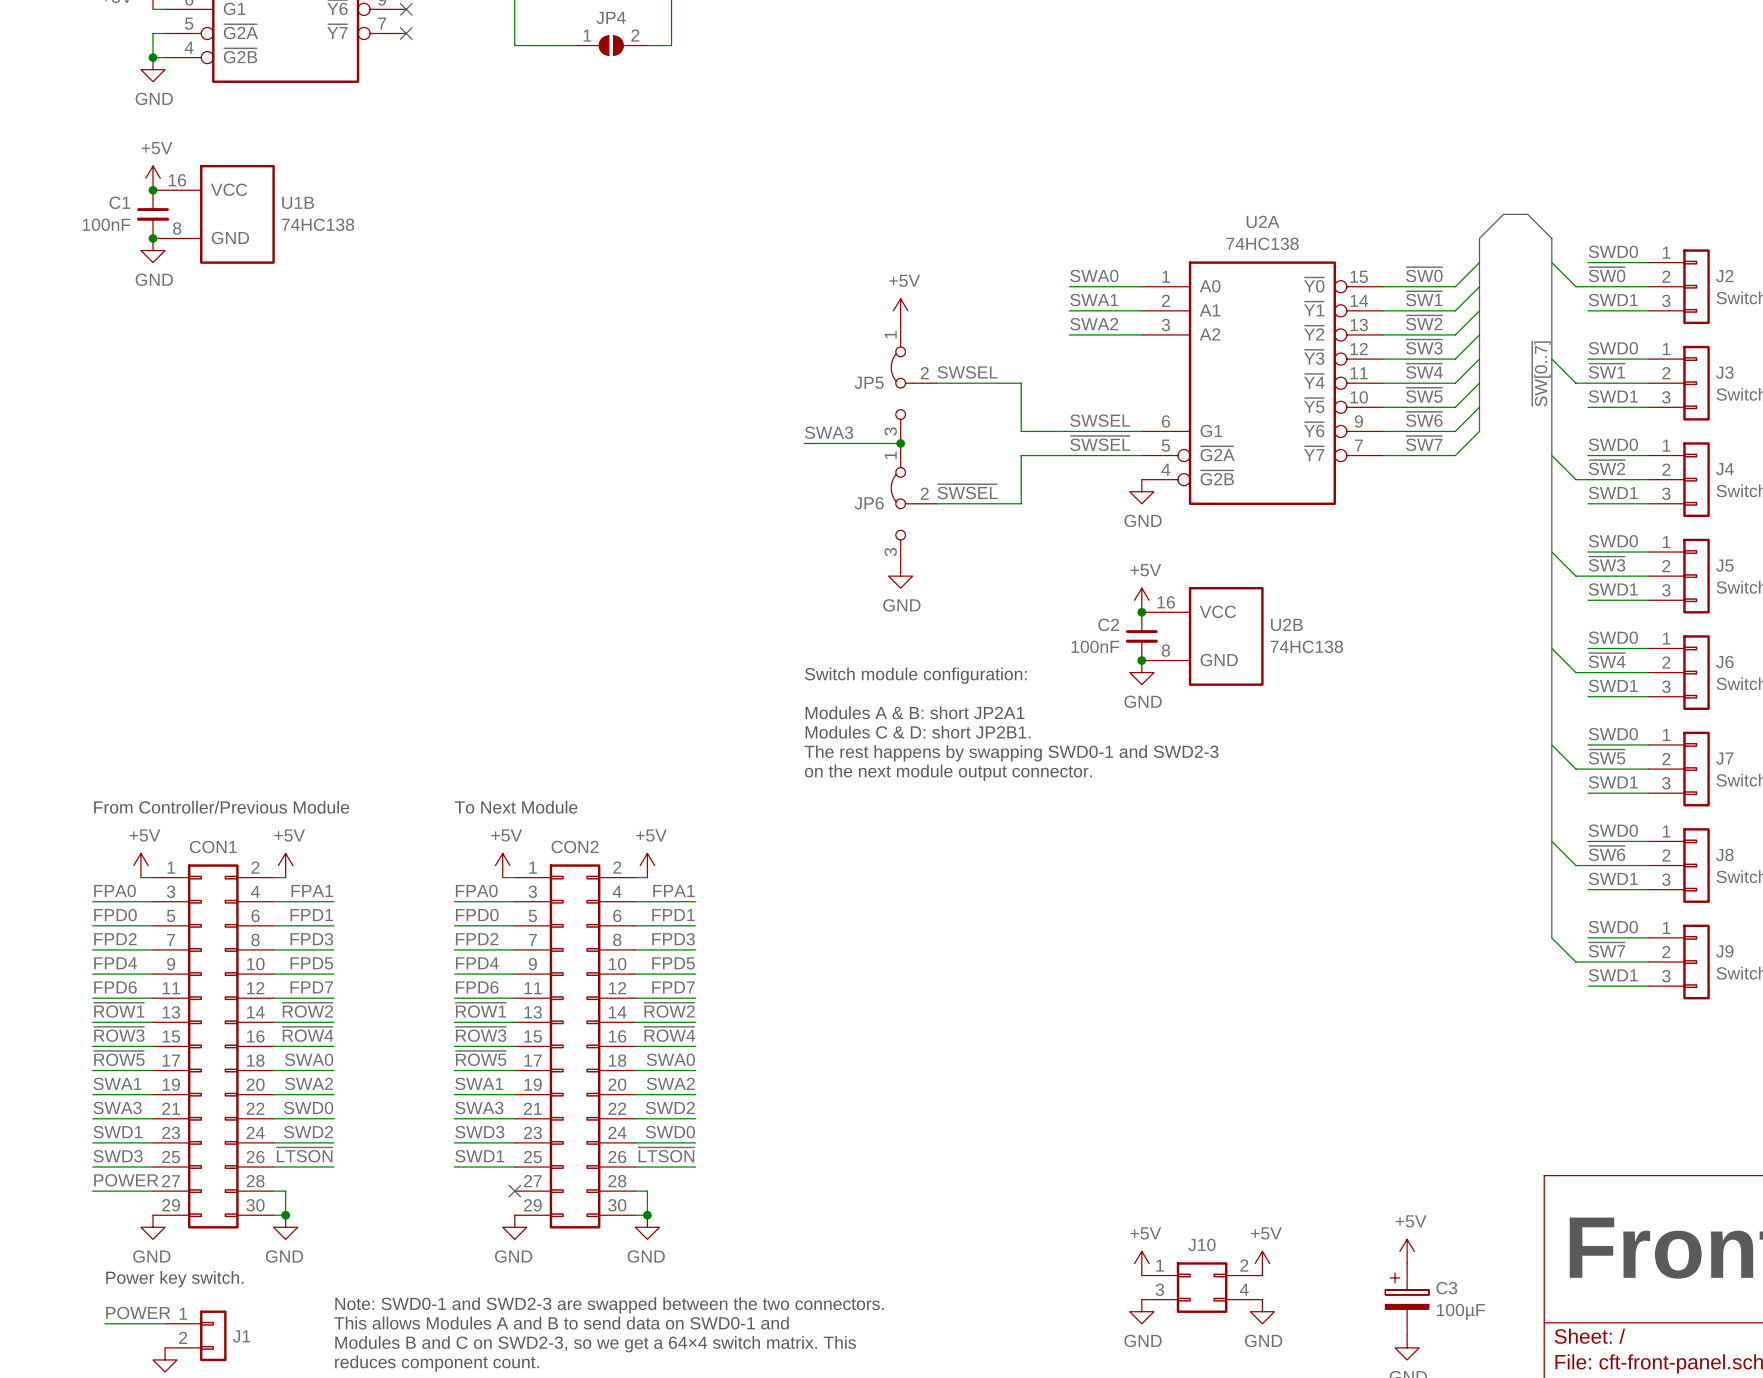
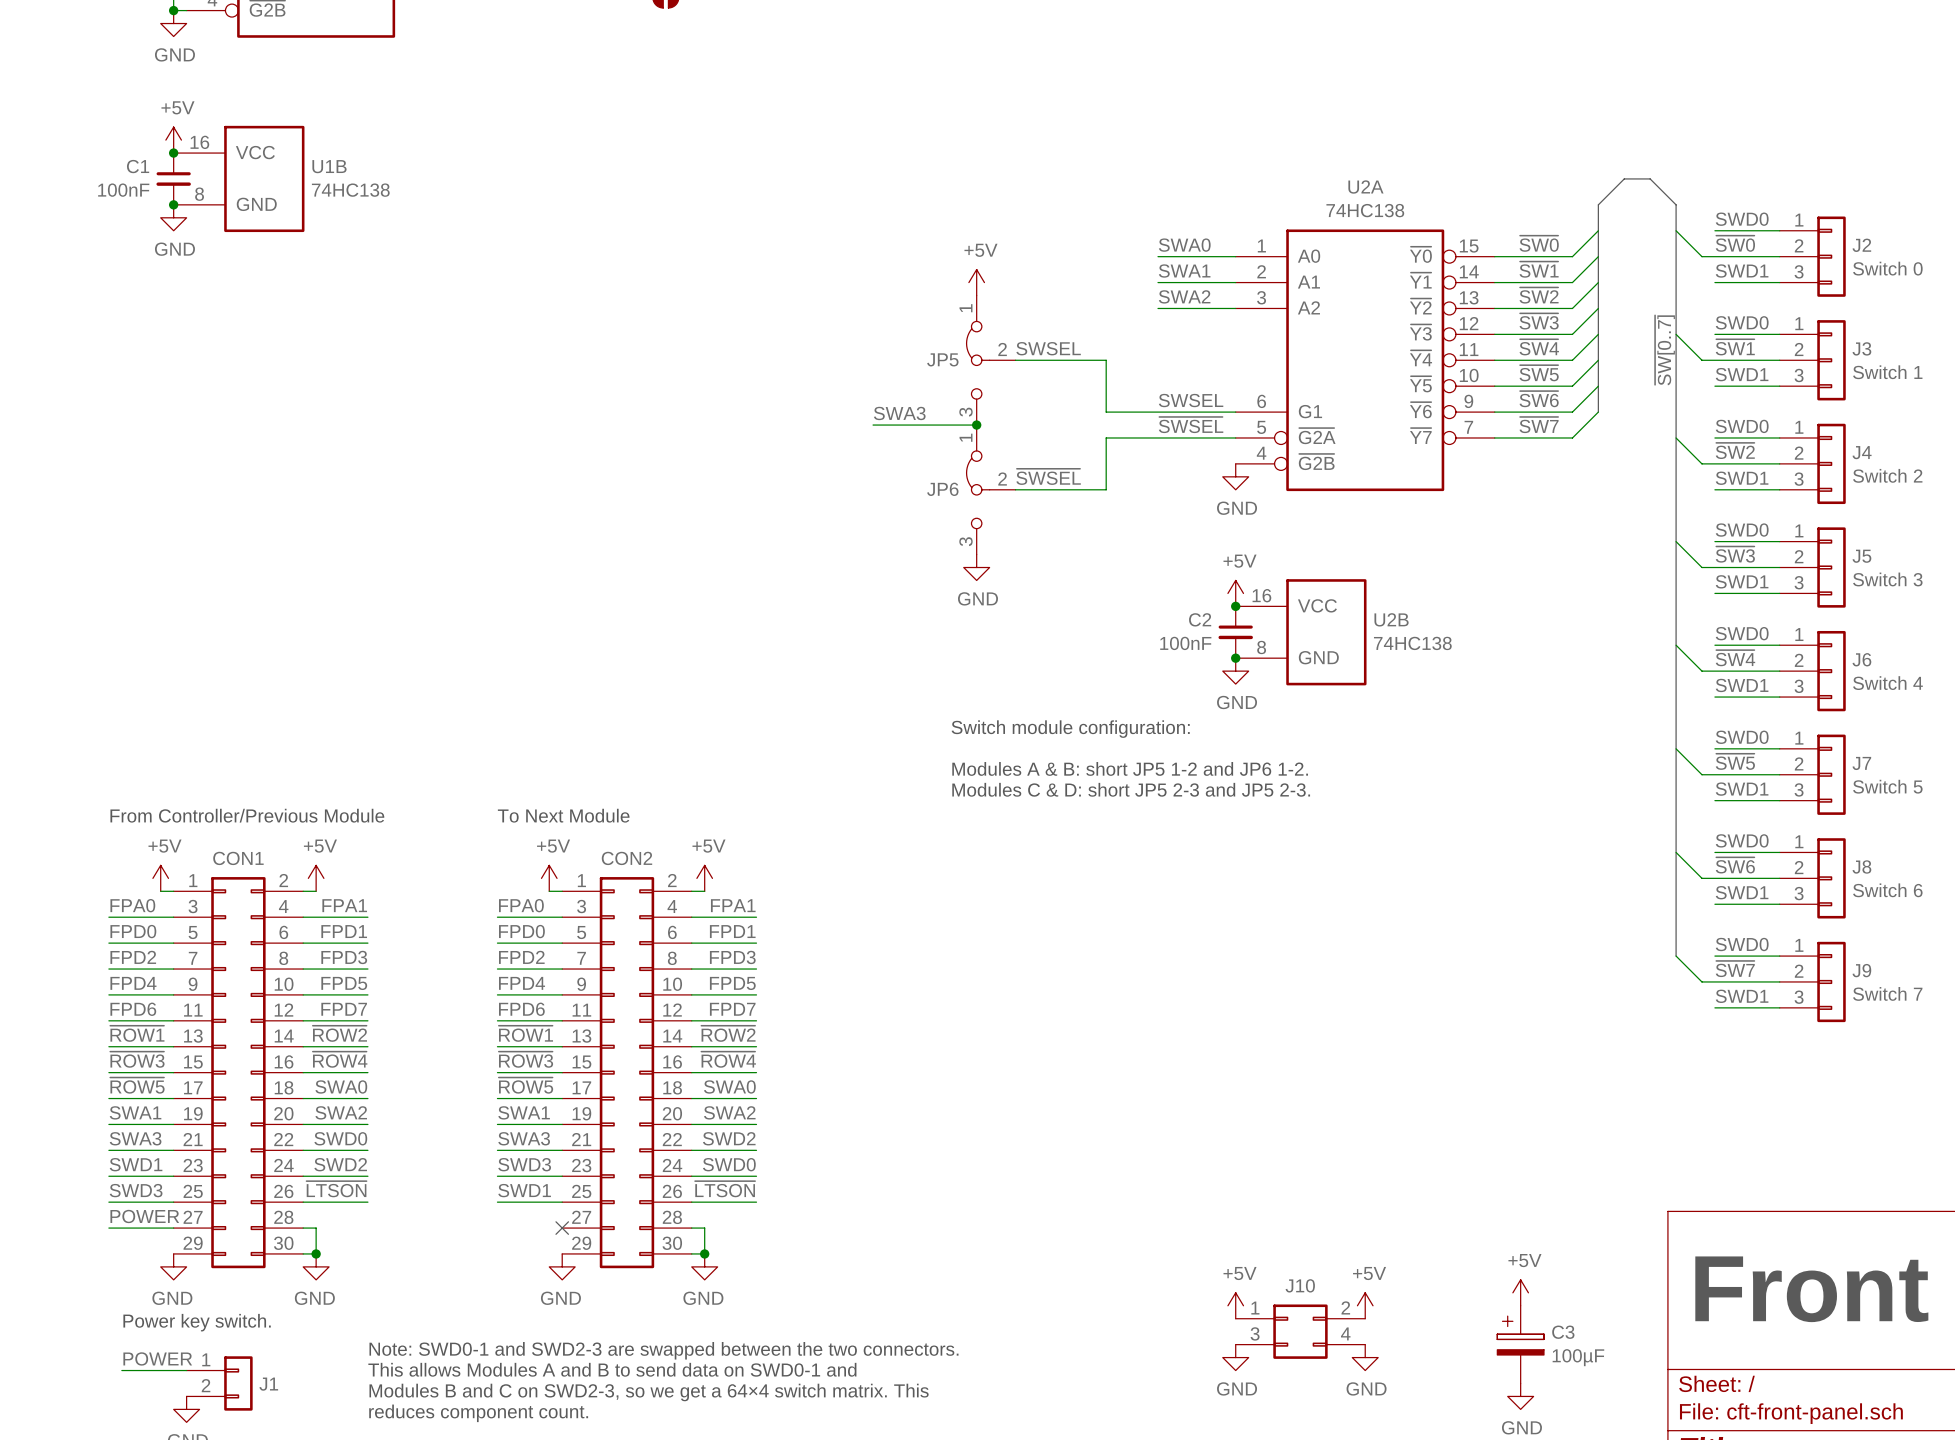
text position: Switch module configuration: (915, 675) -> Switch module configuration: (1070, 729)
text: Modules A & B: short JP2A1 (915, 712) -> none
text: Modules C & D: short JP2B1. (918, 732) -> none
text: The rest happens by swapping SWD0-1 and SWD2-3 (1011, 753) -> none
text: none -> Modules A & B: short JP5 1-2 and JP6 1-2. (1130, 768)
text: on the next module output connector. (948, 772) -> none
text: none -> Modules C & D: short JP5 2-3 and JP5 2-3. (1131, 789)

